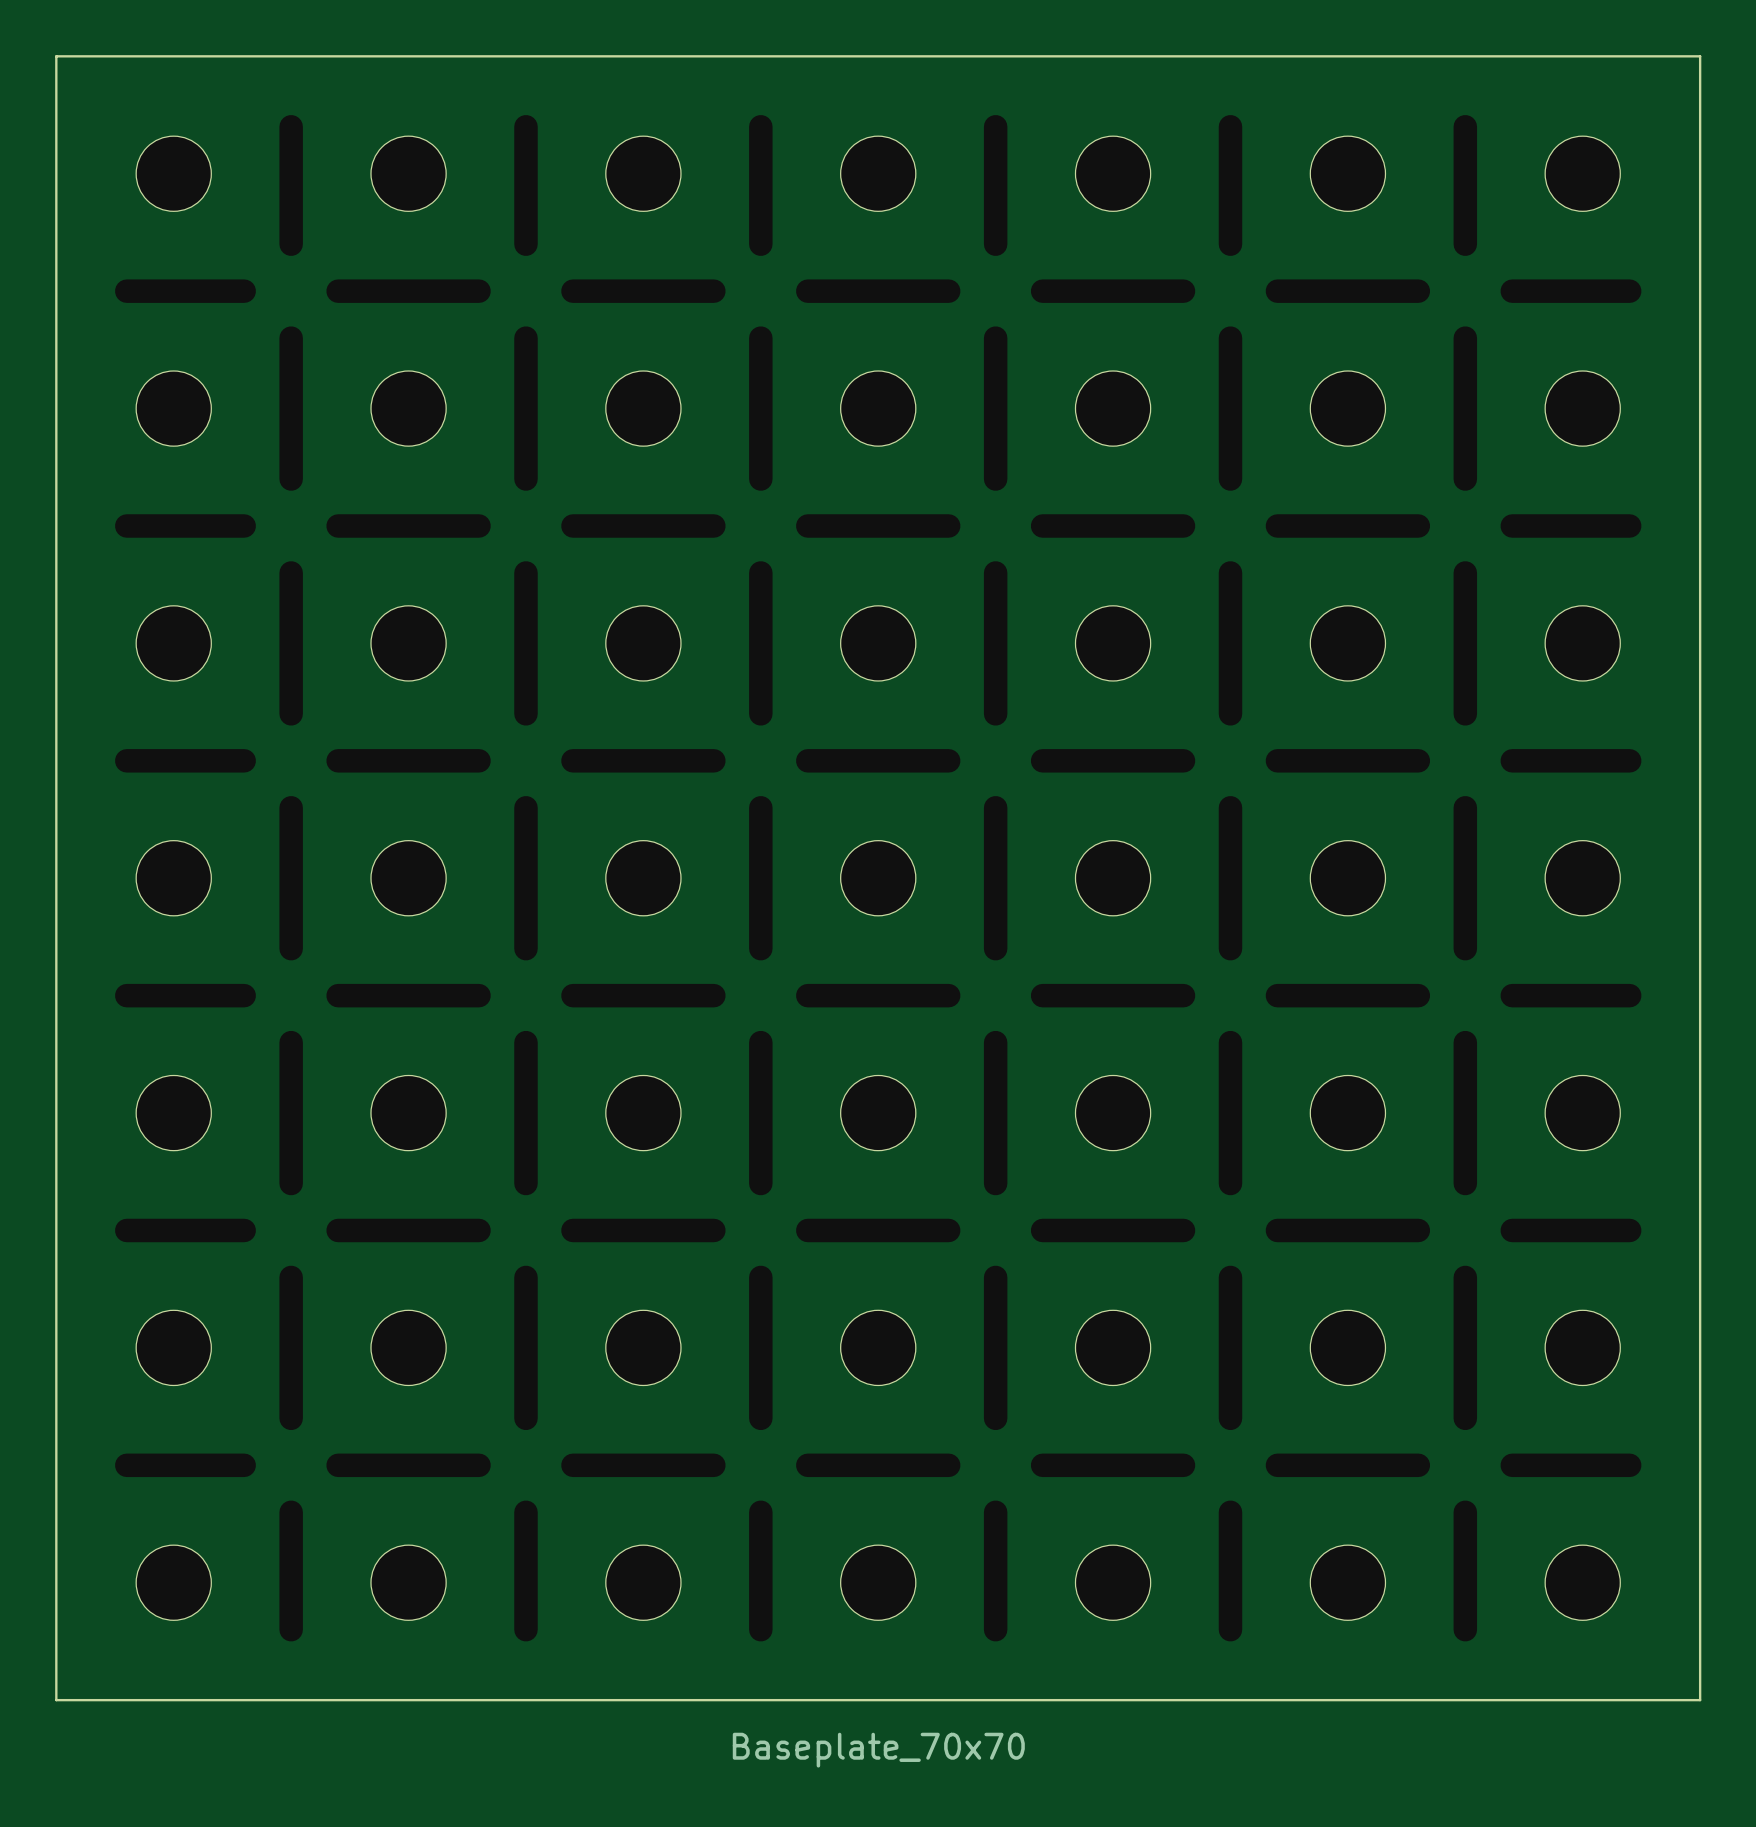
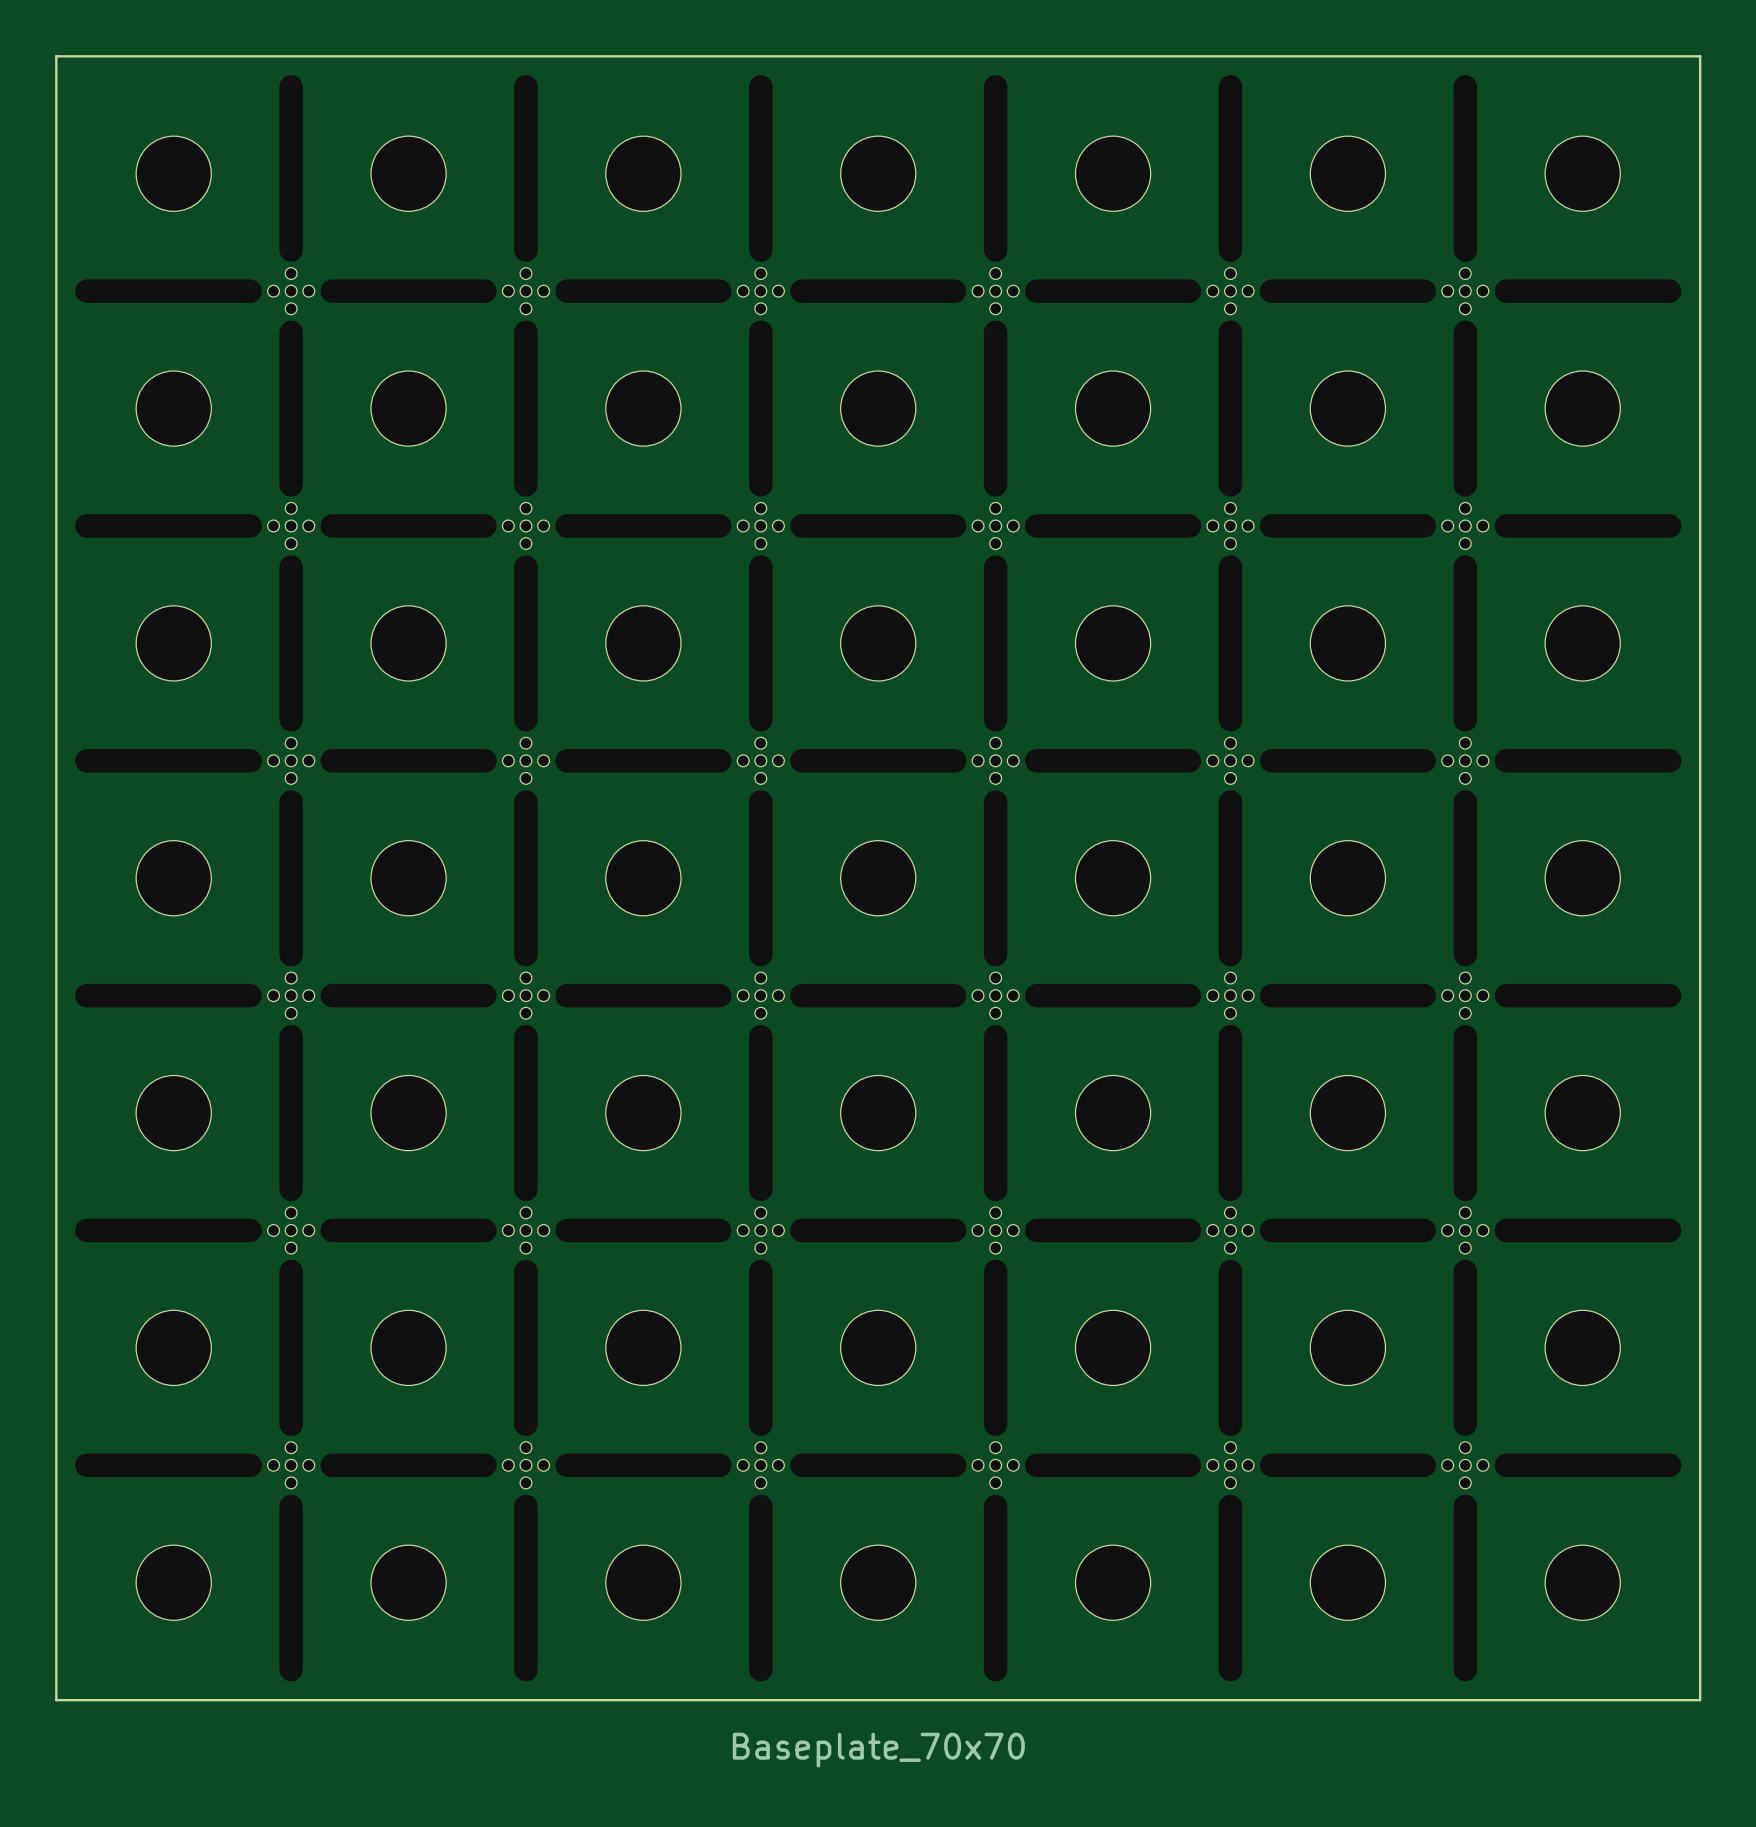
part footprint: [115, 115, 1642, 1642] -> [75, 75, 1682, 1682]

